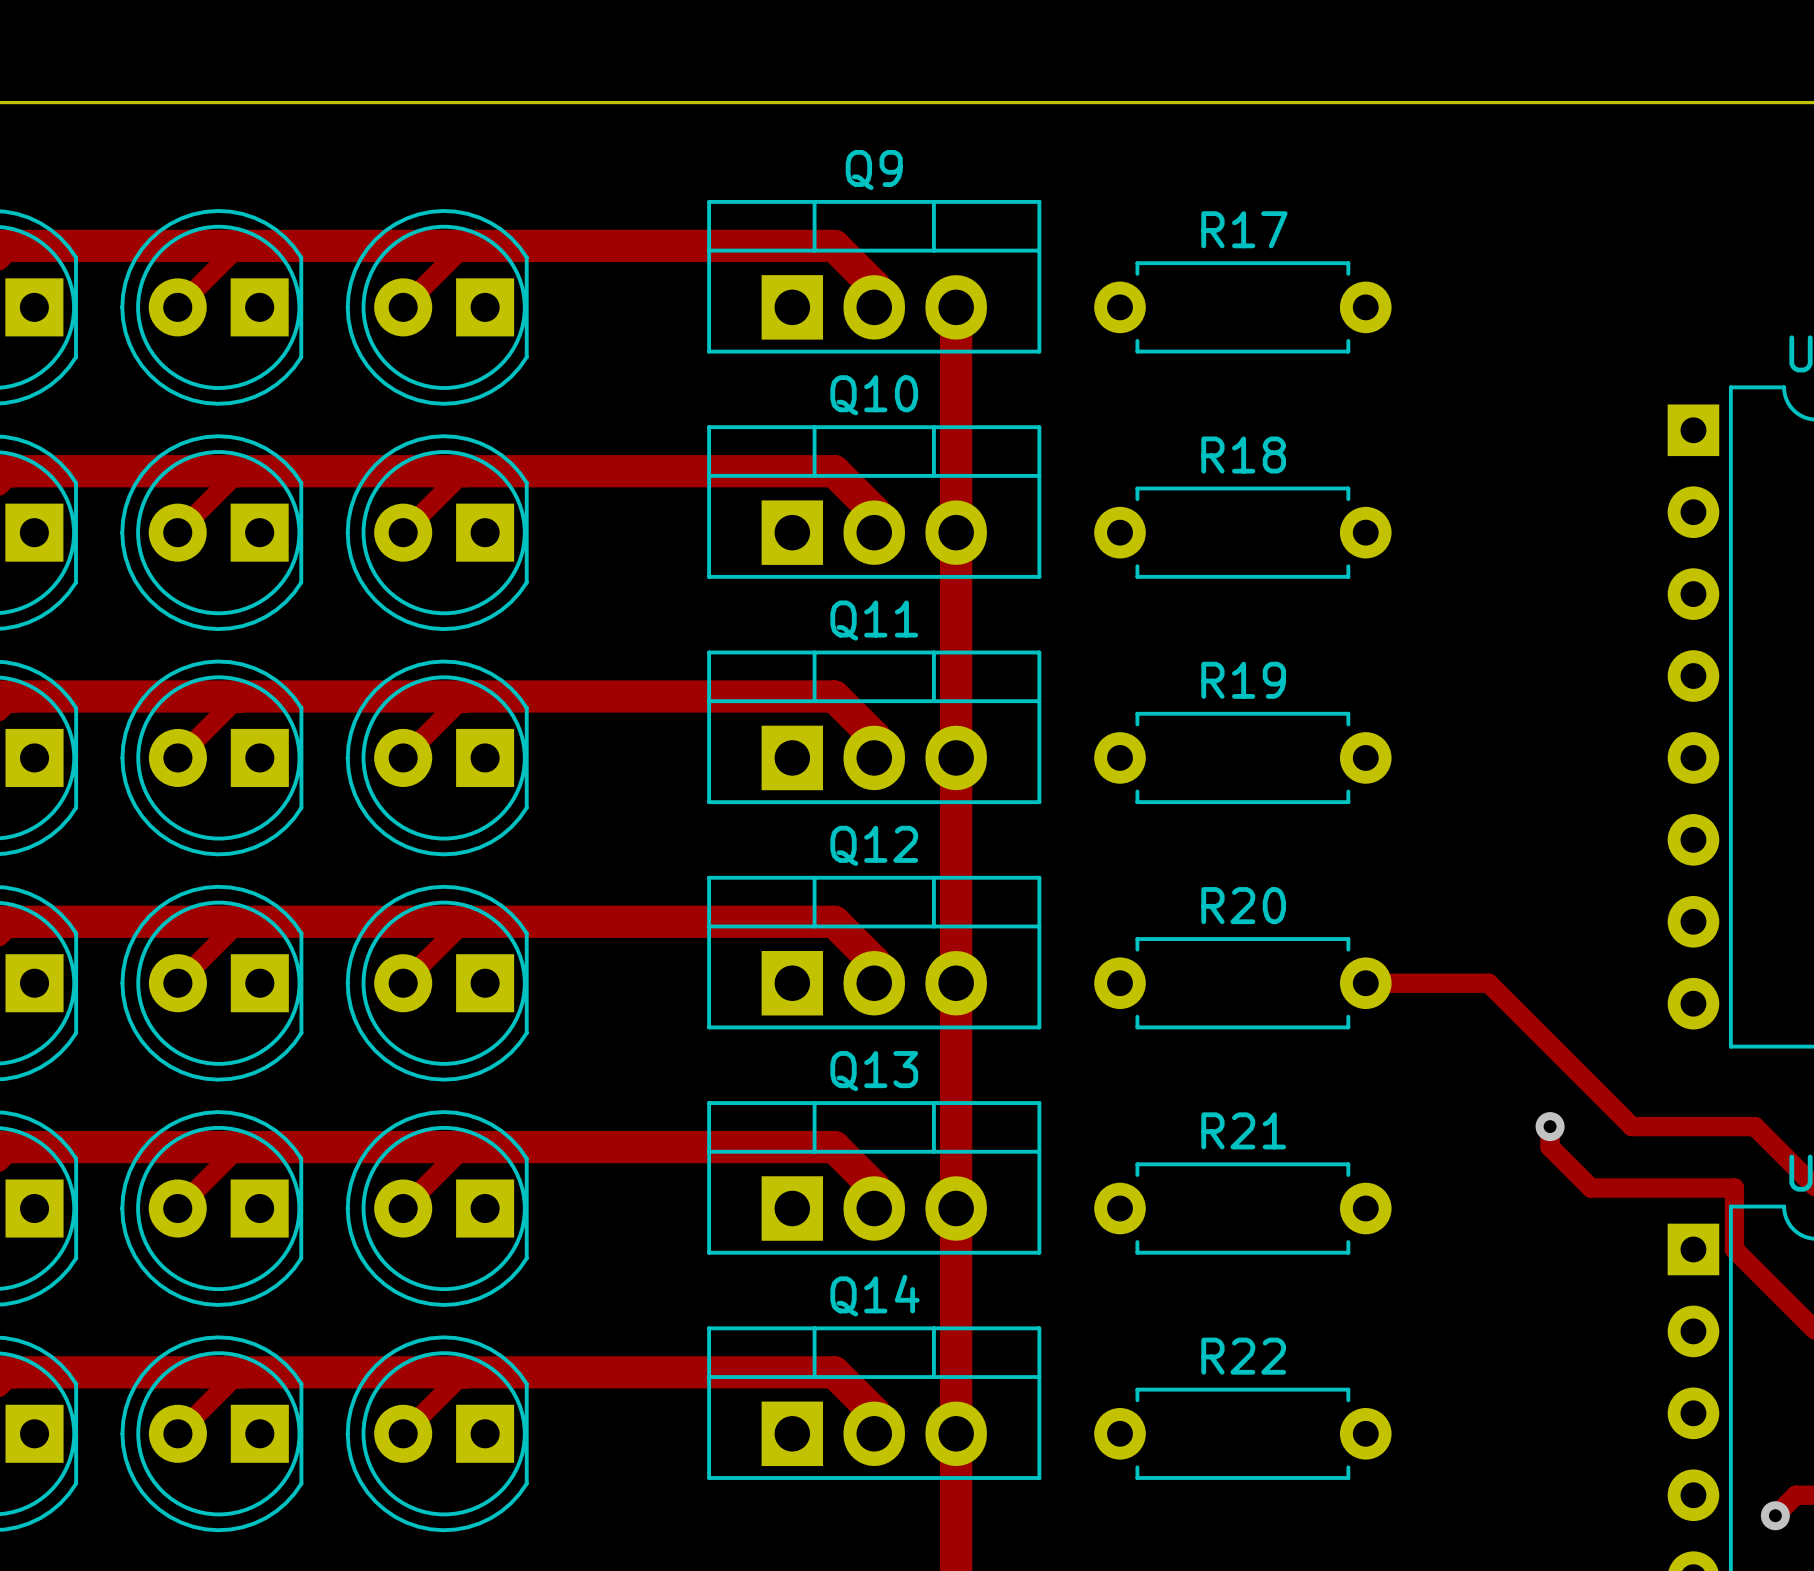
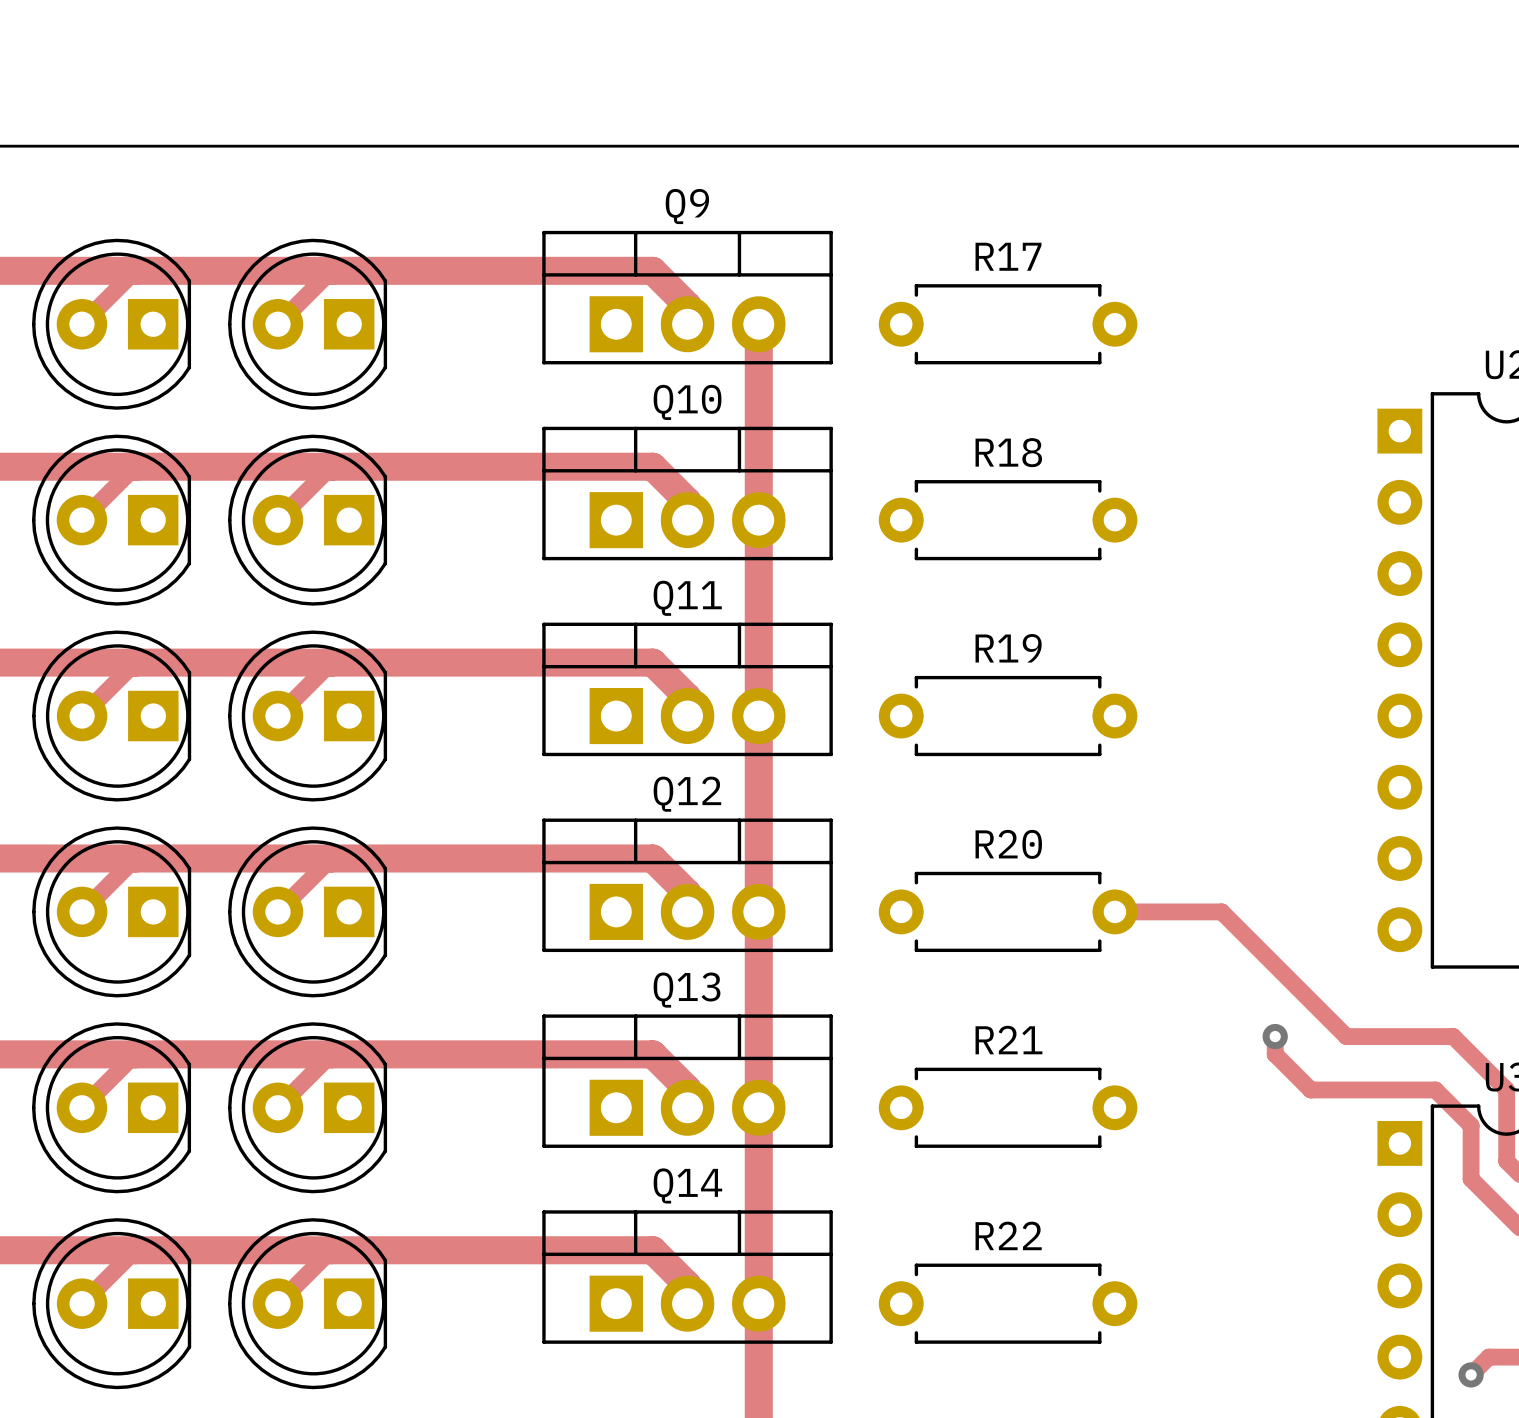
track: (1734, 1188) (1734, 1249) (1775, 1290) -> (1435, 1089) (1471, 1125) (1471, 1179)

